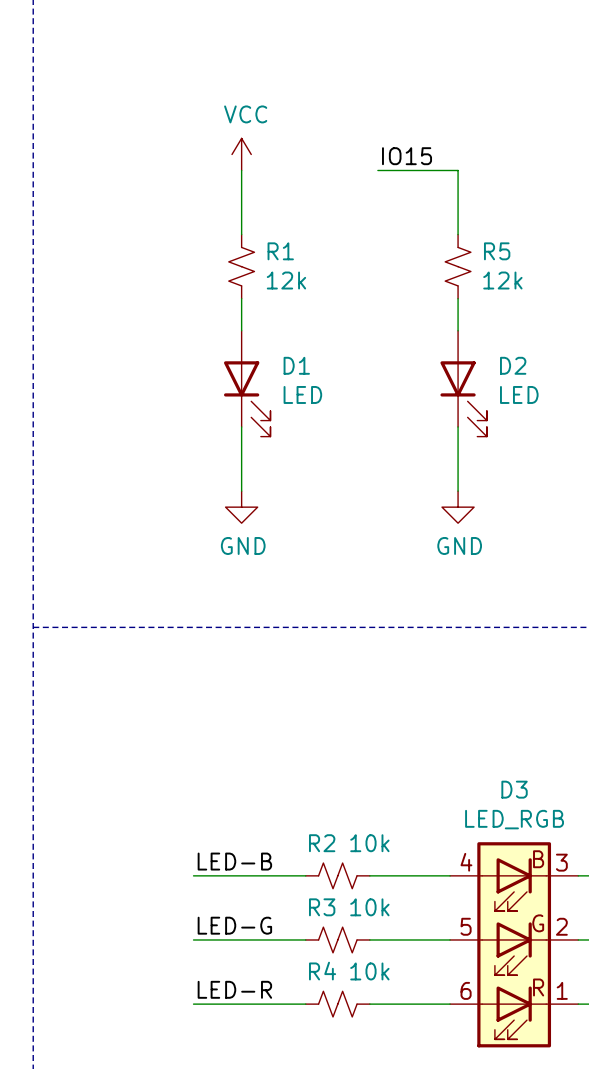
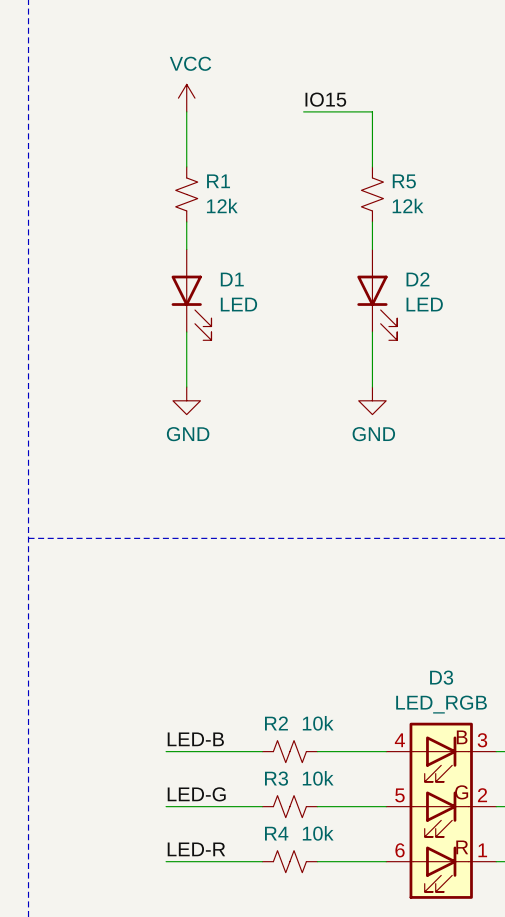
power symbol position: VCC (241, 154) -> VCC (186, 98)
label position: IO15 (407, 156) -> IO15 (325, 99)
wire: (241, 170) (241, 234) -> (186, 111) (186, 166)
wire: (377, 170) (458, 170) (458, 234) -> (303, 111) (372, 111) (372, 166)
R1 position: (241, 266) -> (186, 194)
R5 position: (458, 266) -> (372, 194)
wire: (241, 298) (241, 330) -> (186, 221) (186, 249)
wire: (458, 298) (458, 330) -> (372, 221) (372, 249)
D1 position: (247, 383) -> (191, 294)
D2 position: (463, 383) -> (377, 294)
wire: (241, 426) (241, 491) -> (186, 332) (186, 387)
wire: (458, 426) (458, 491) -> (372, 332) (372, 387)
power symbol position: GND (241, 507) -> GND (186, 400)
power symbol position: GND (458, 507) -> GND (372, 400)

